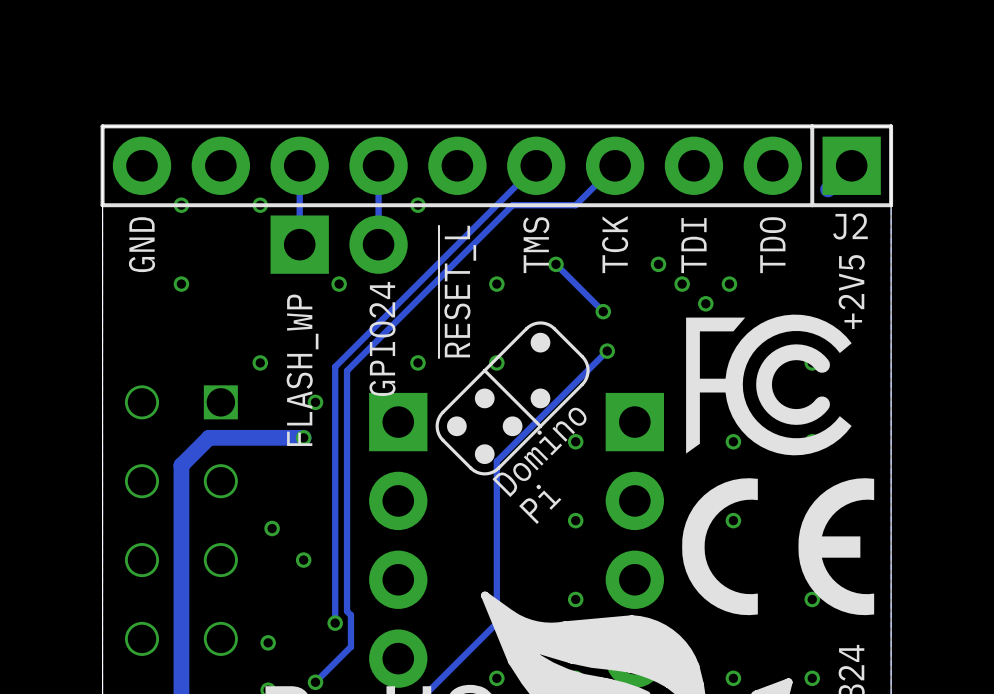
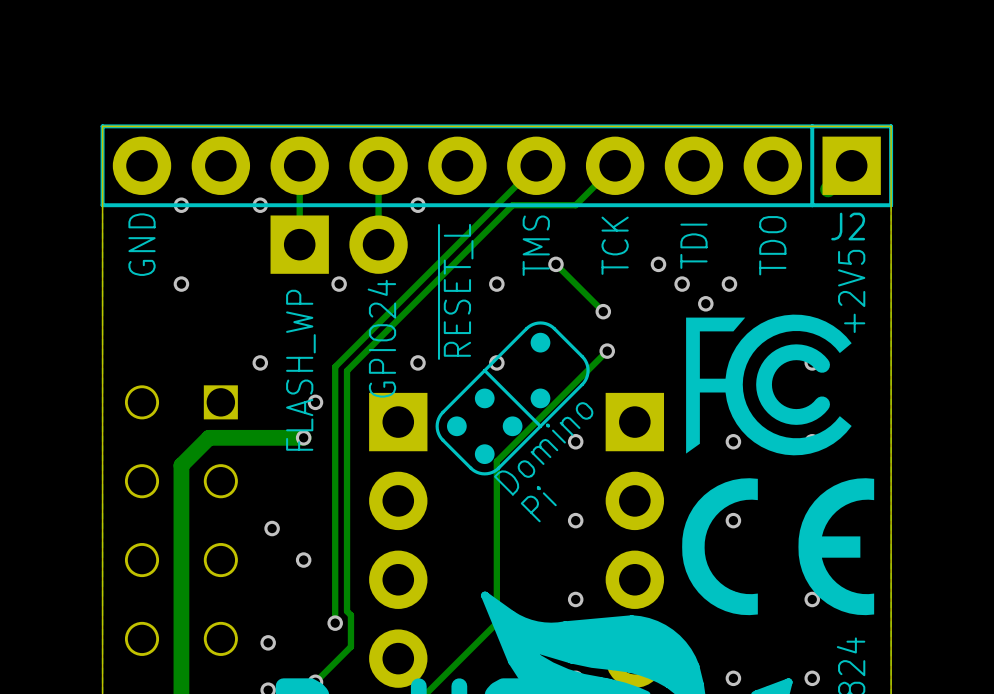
via: (496, 678) -> none

